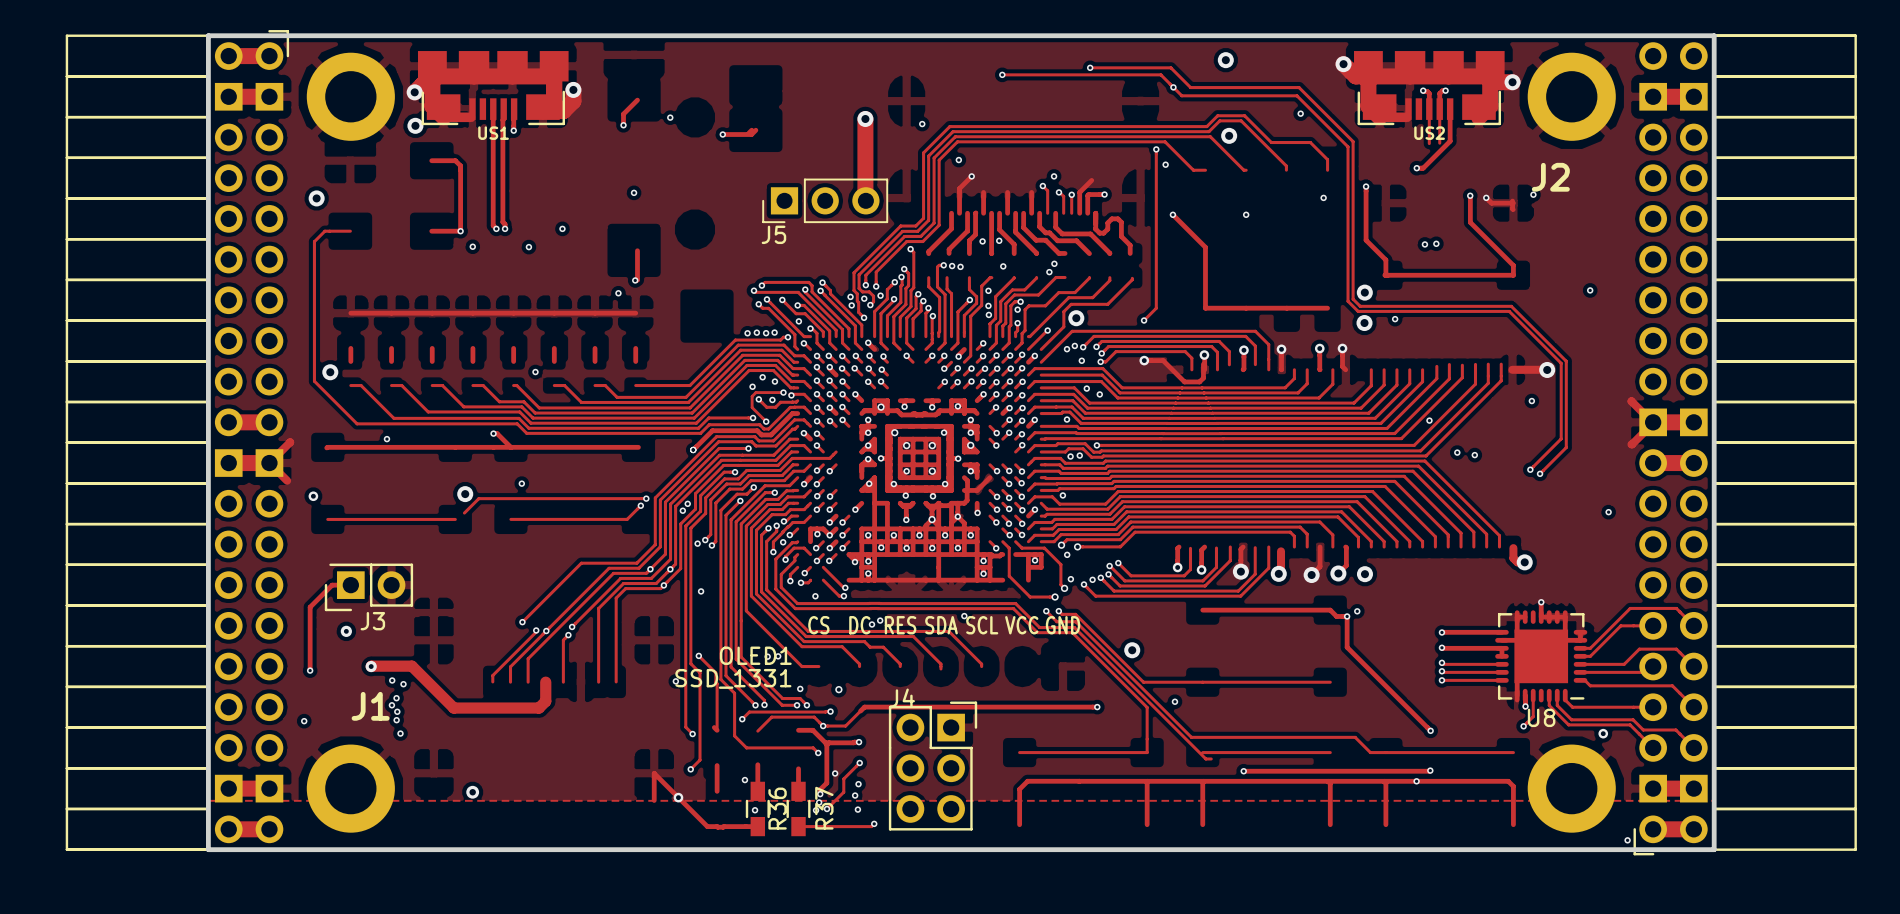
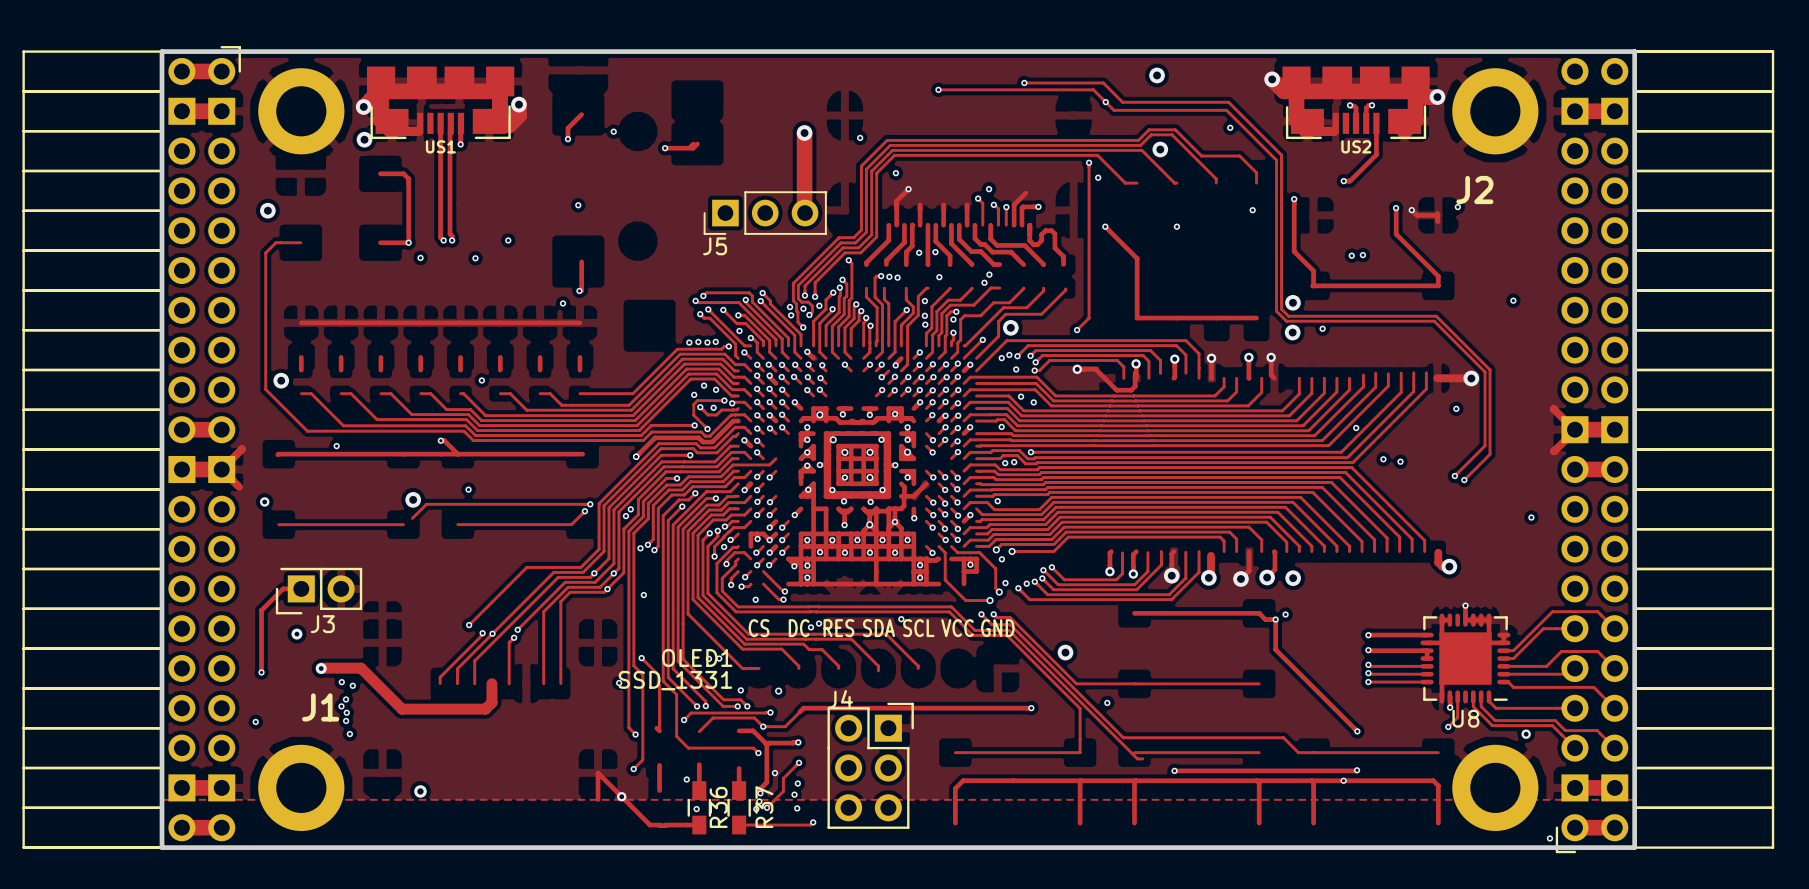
track: (1429, 119) (1429, 143) -> none
track: (1439, 119) (1439, 143) -> none

